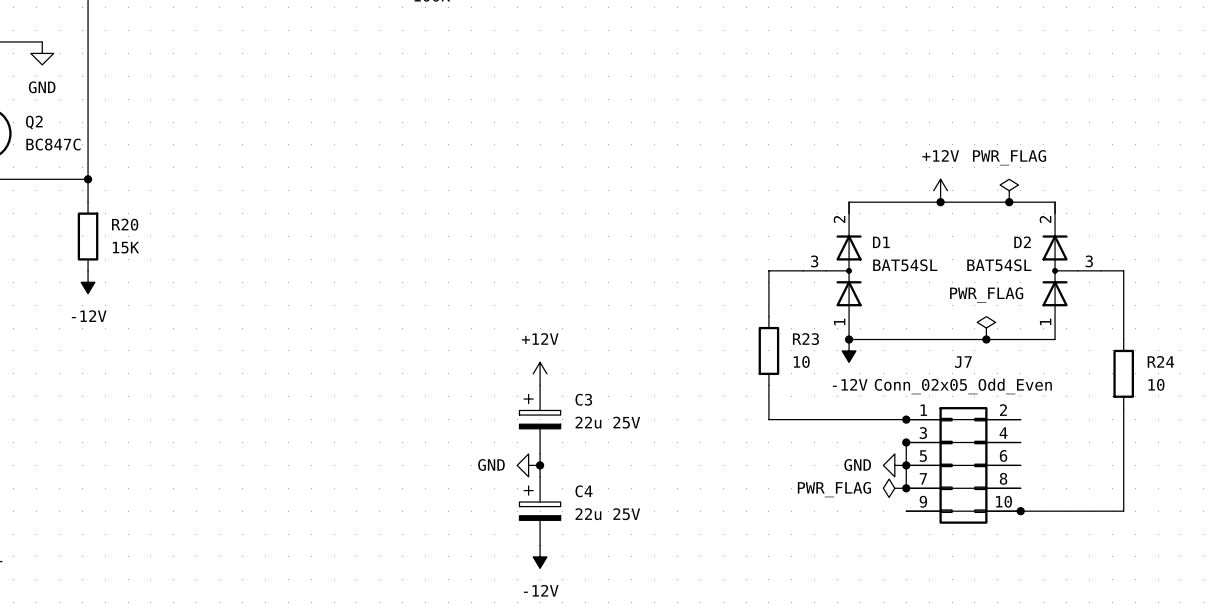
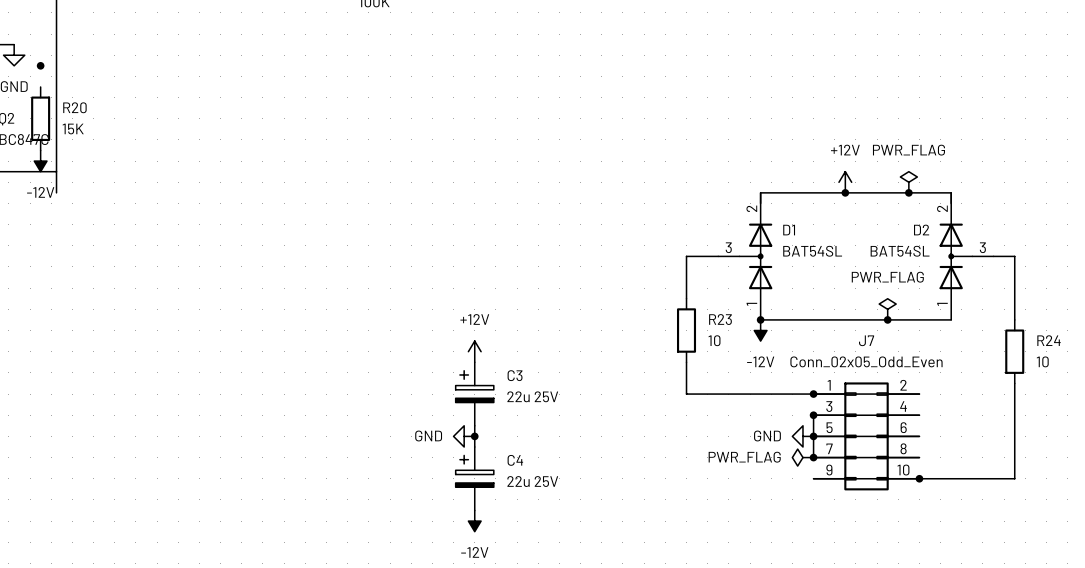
junction: none -> (40, 65)
power symbol: none -> -12V (40, 161)
junction: (88, 179) -> none
R20 position: (88, 236) -> (40, 118)
power symbol: -12V (88, 282) -> none

